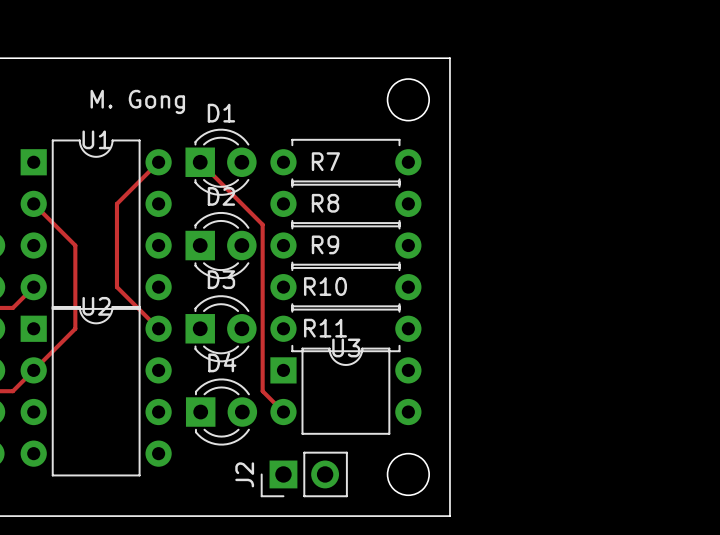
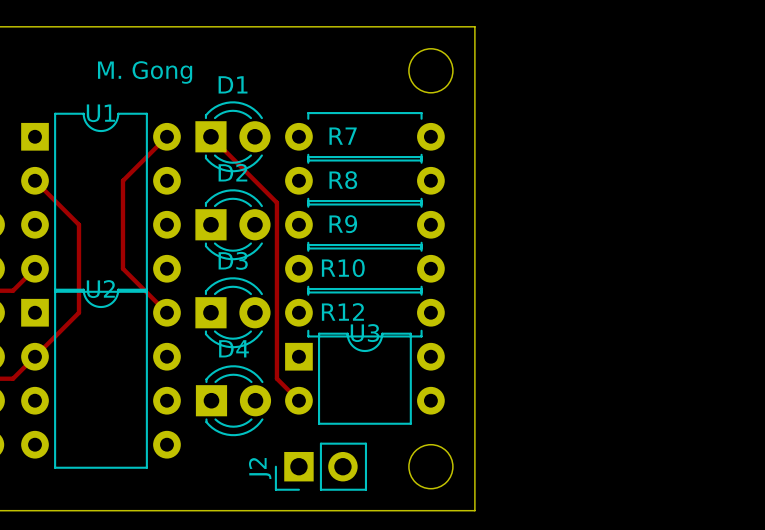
R11 name: R11 (325, 328) -> R12 (342, 311)

